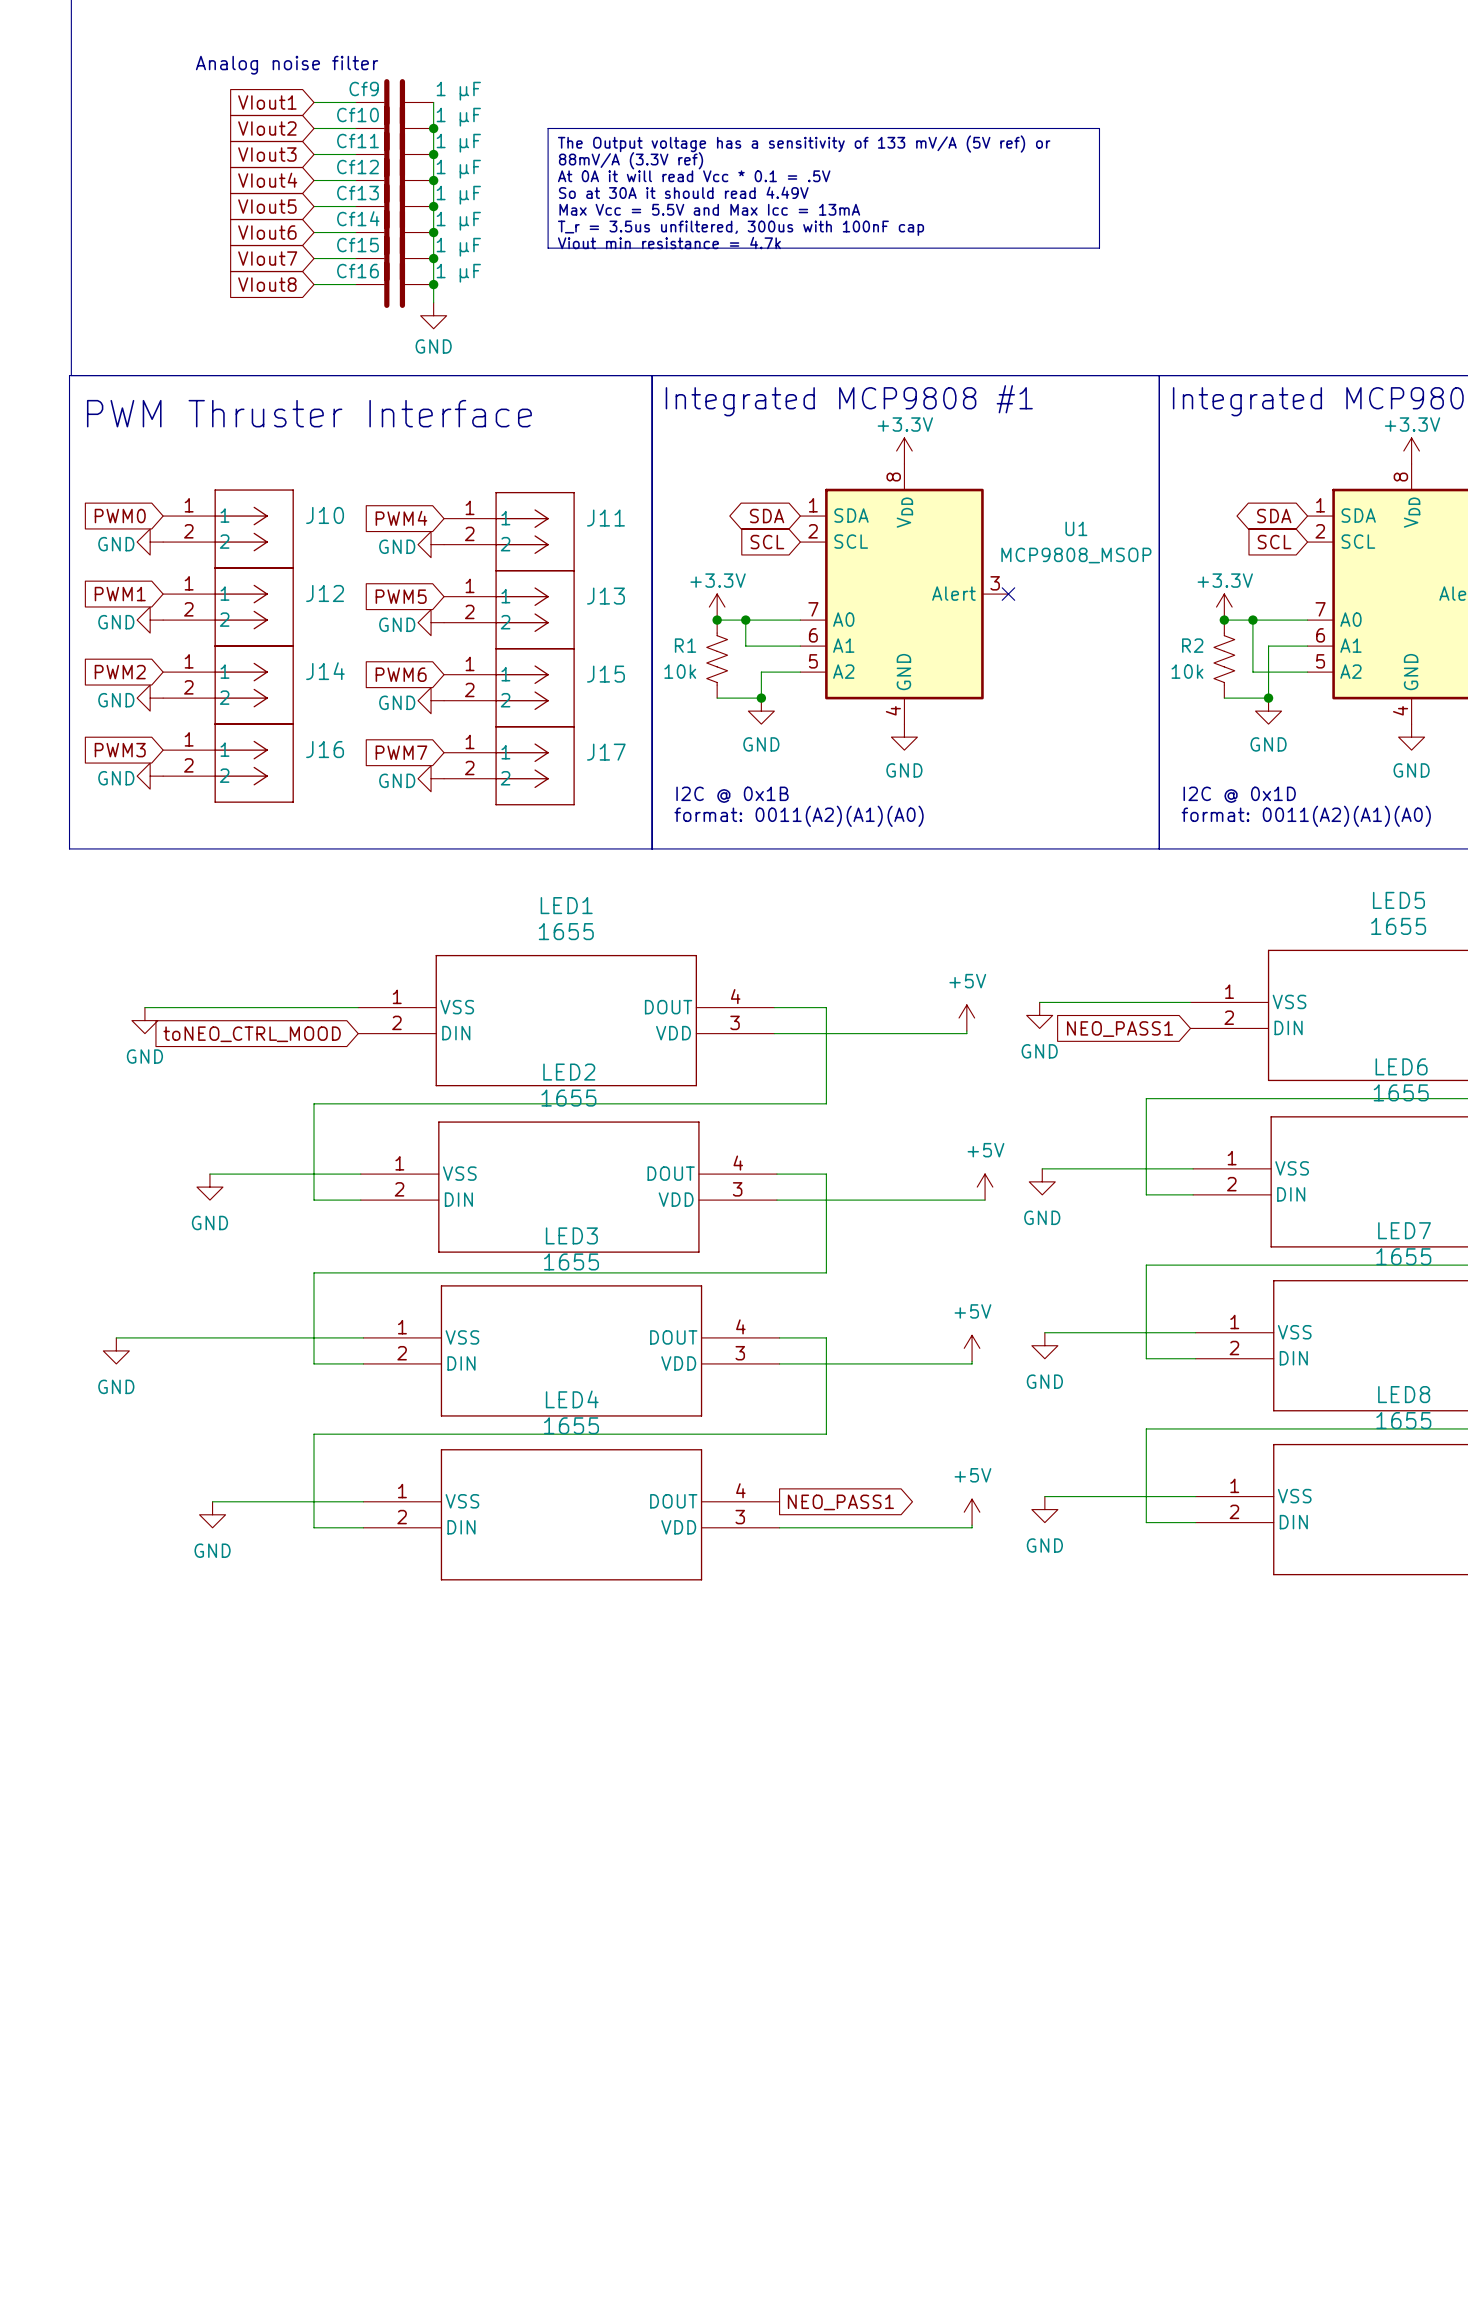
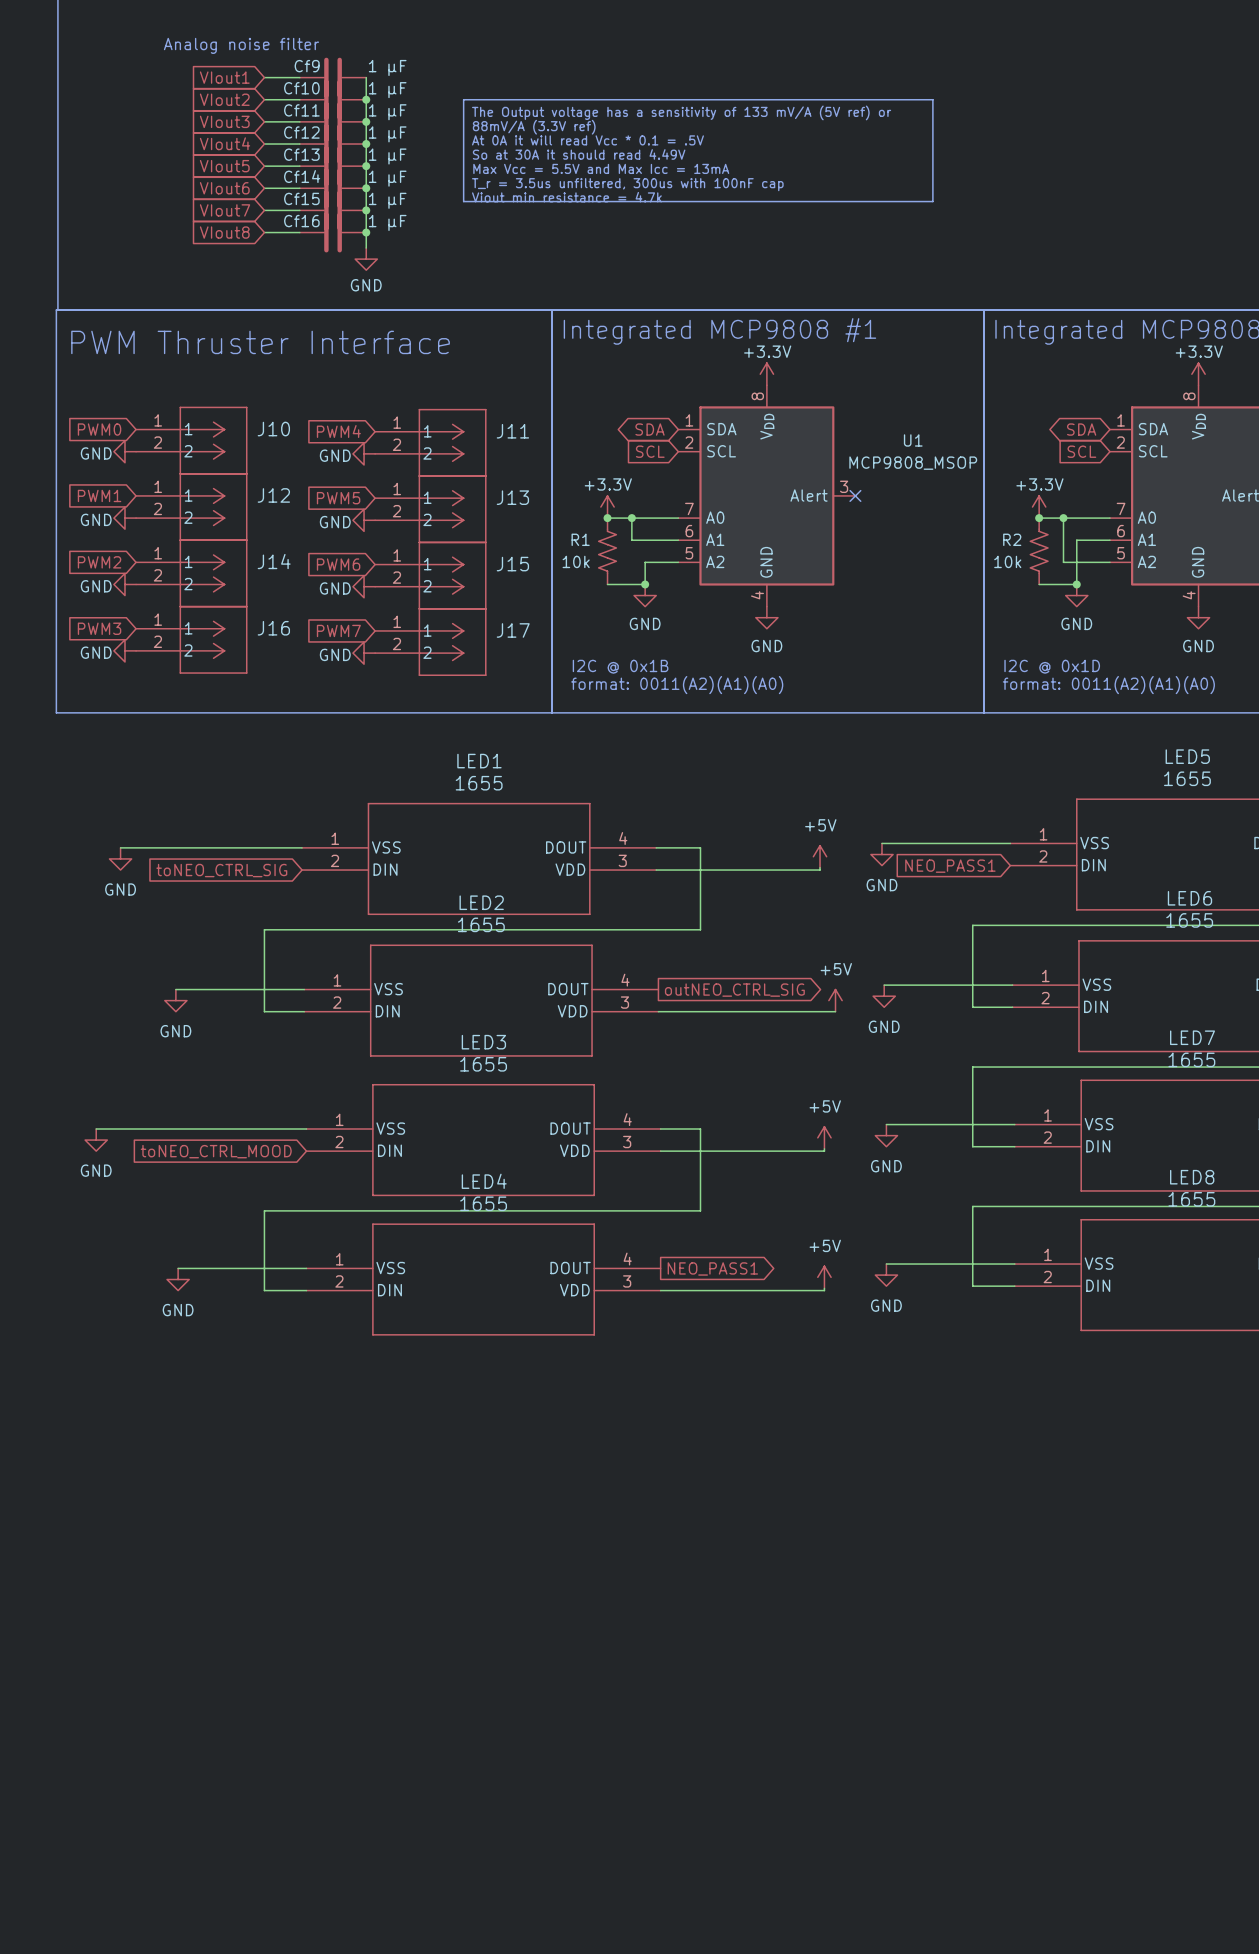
global label: toNEO_CTRL_MOOD (252, 1034) -> toNEO_CTRL_SIG (221, 870)
wire: (776, 1174) (826, 1174) (826, 1272) (314, 1272) (314, 1363) (363, 1363) -> none
global label: none -> outNEO_CTRL_SIG (734, 990)
global label: none -> toNEO_CTRL_MOOD (216, 1151)

